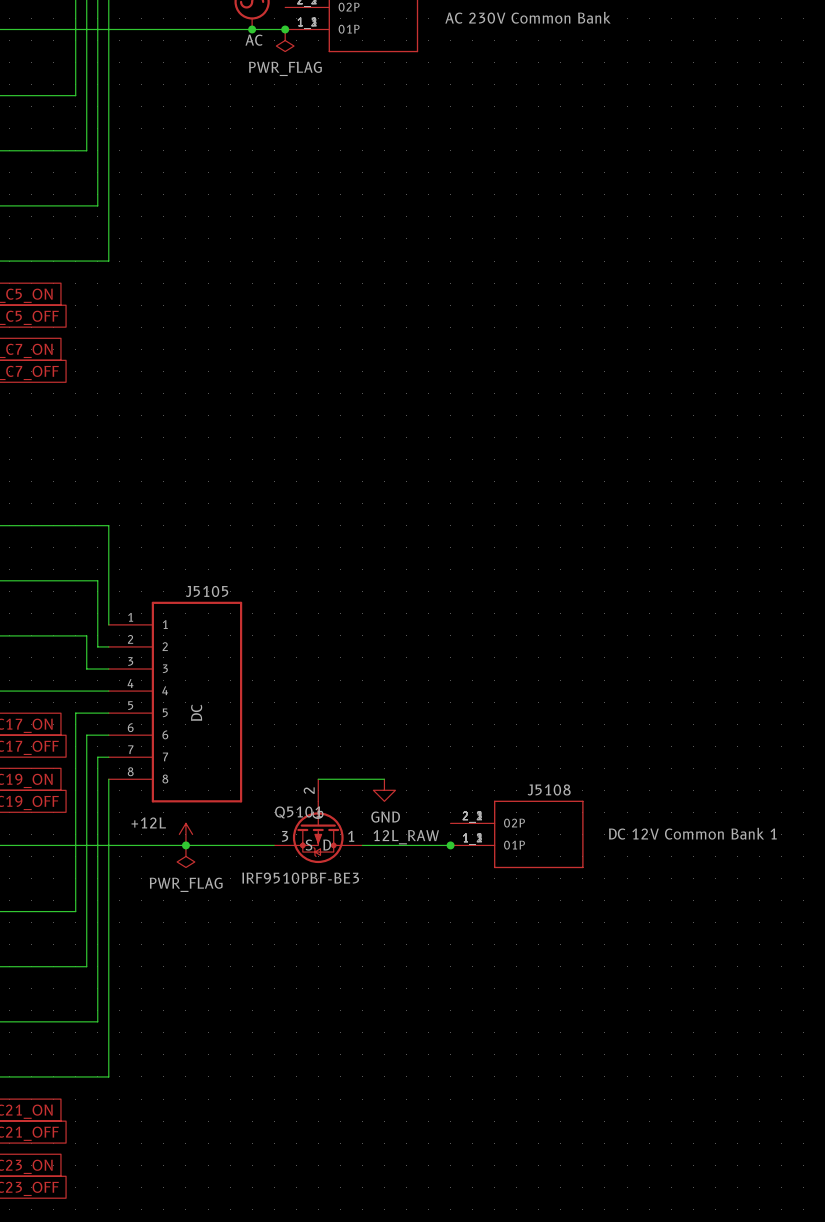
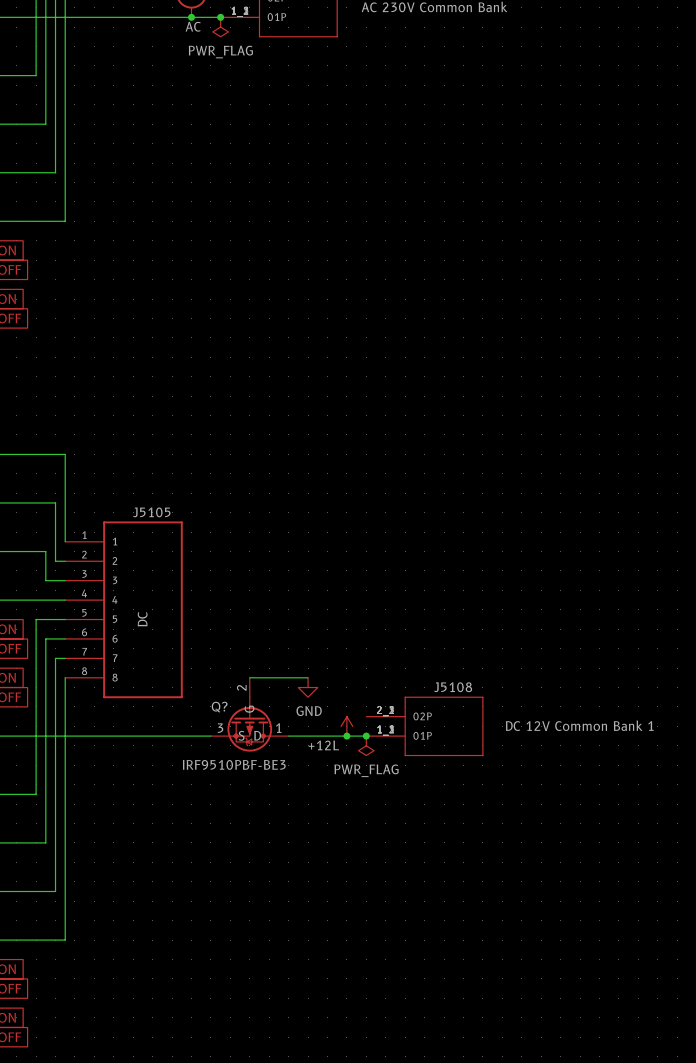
Q5101 name: Q5101 (298, 812) -> Q? (219, 707)
power symbol: +12L (185, 834) -> none
power symbol: none -> +12L (346, 726)
label: 12L_RAW (406, 837) -> none
junction: (185, 845) -> none
junction: none -> (346, 736)
power symbol: PWR_FLAG (185, 856) -> none
power symbol: none -> PWR_FLAG (366, 745)

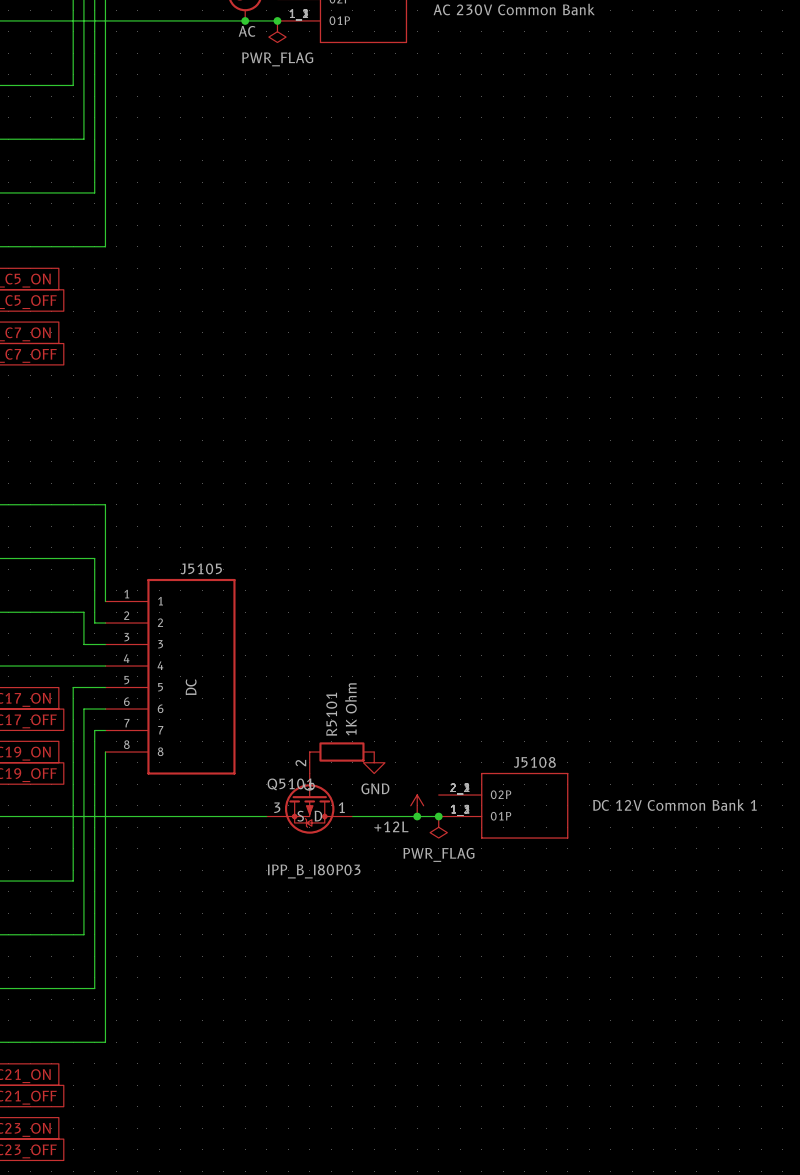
wire: (249, 677) (308, 677) -> none
R5101: none -> 1K Ohm (341, 752)
Q? name: Q? (219, 707) -> Q5101 (290, 784)
Q? value: IRF9510PBF-BE3 (234, 764) -> IPP_B_I80P03 (314, 871)

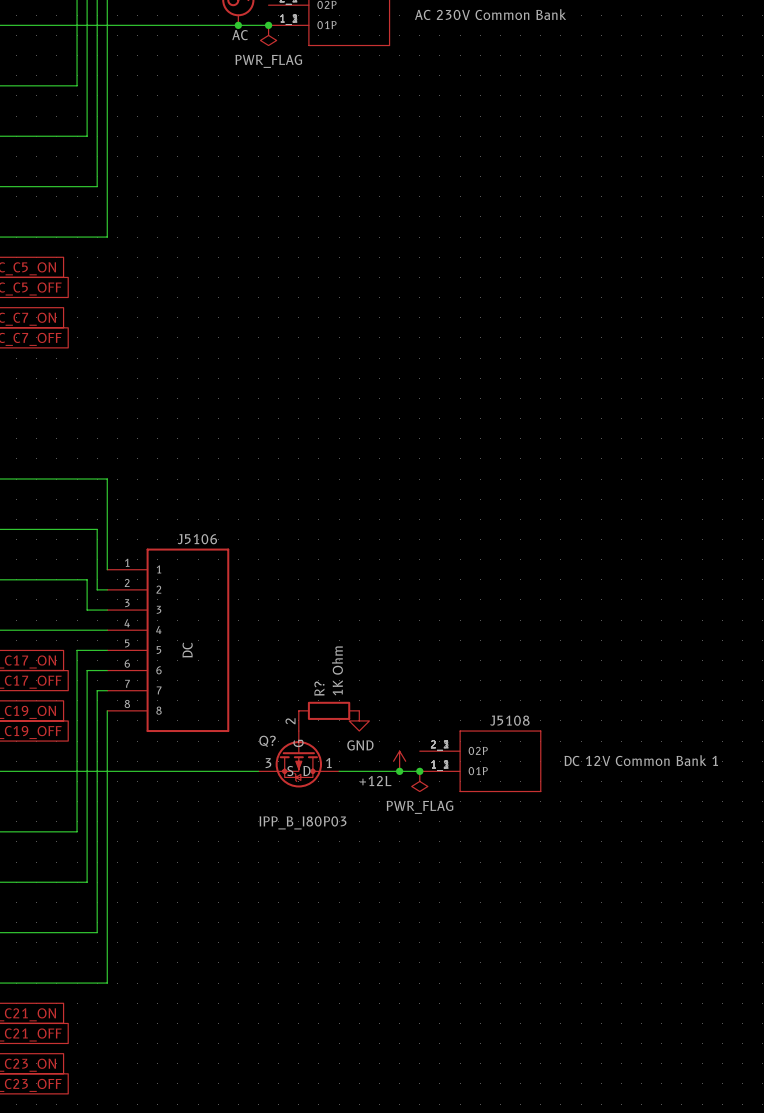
J5105 name: J5105 (201, 568) -> J5106 (197, 539)
R5101 name: R5101 (331, 714) -> R? (319, 688)
Q5101 name: Q5101 (290, 784) -> Q? (267, 741)

